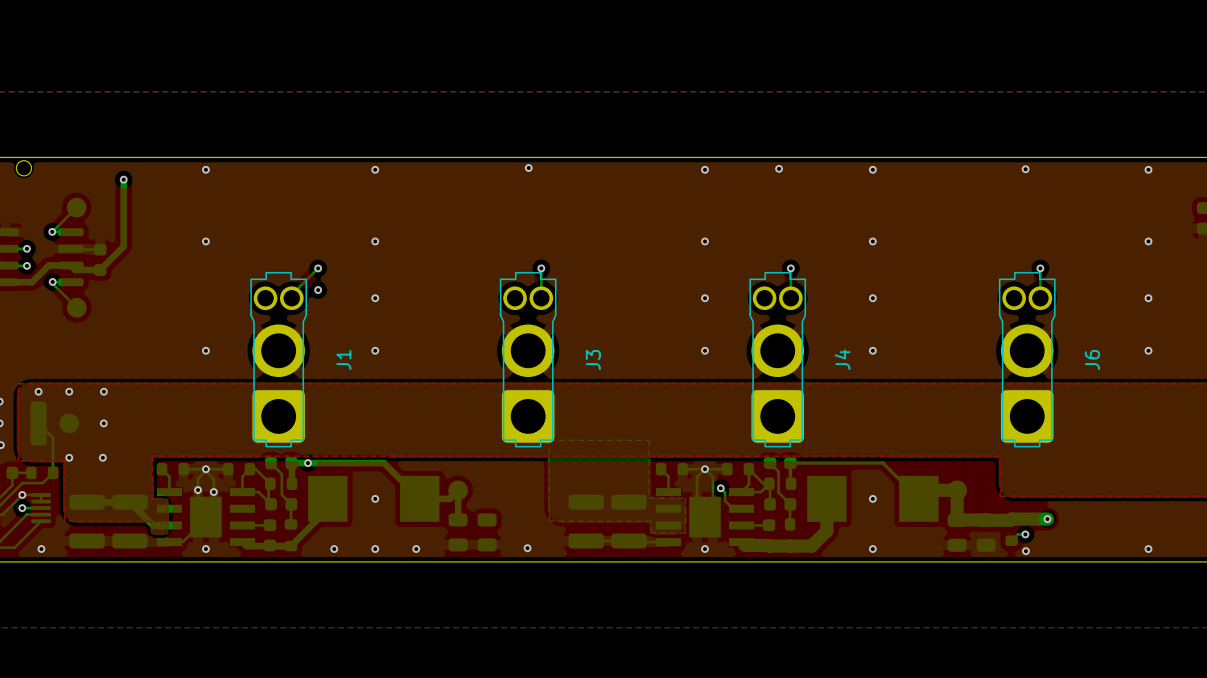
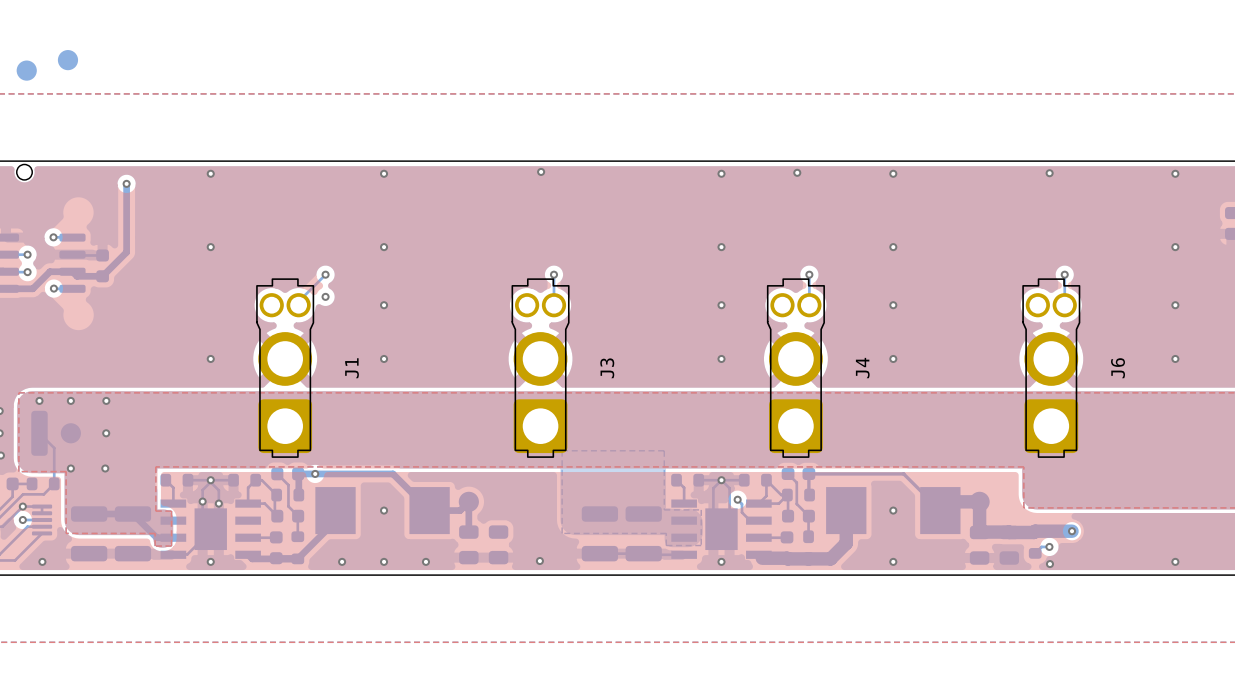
part: none -> (67, 60)
part: none -> (26, 70)
bottom track: (76, 207) (52, 231) -> none
part: (76, 207) -> none
bottom track: (52, 283) (76, 307) -> none
part: (76, 307) -> none

